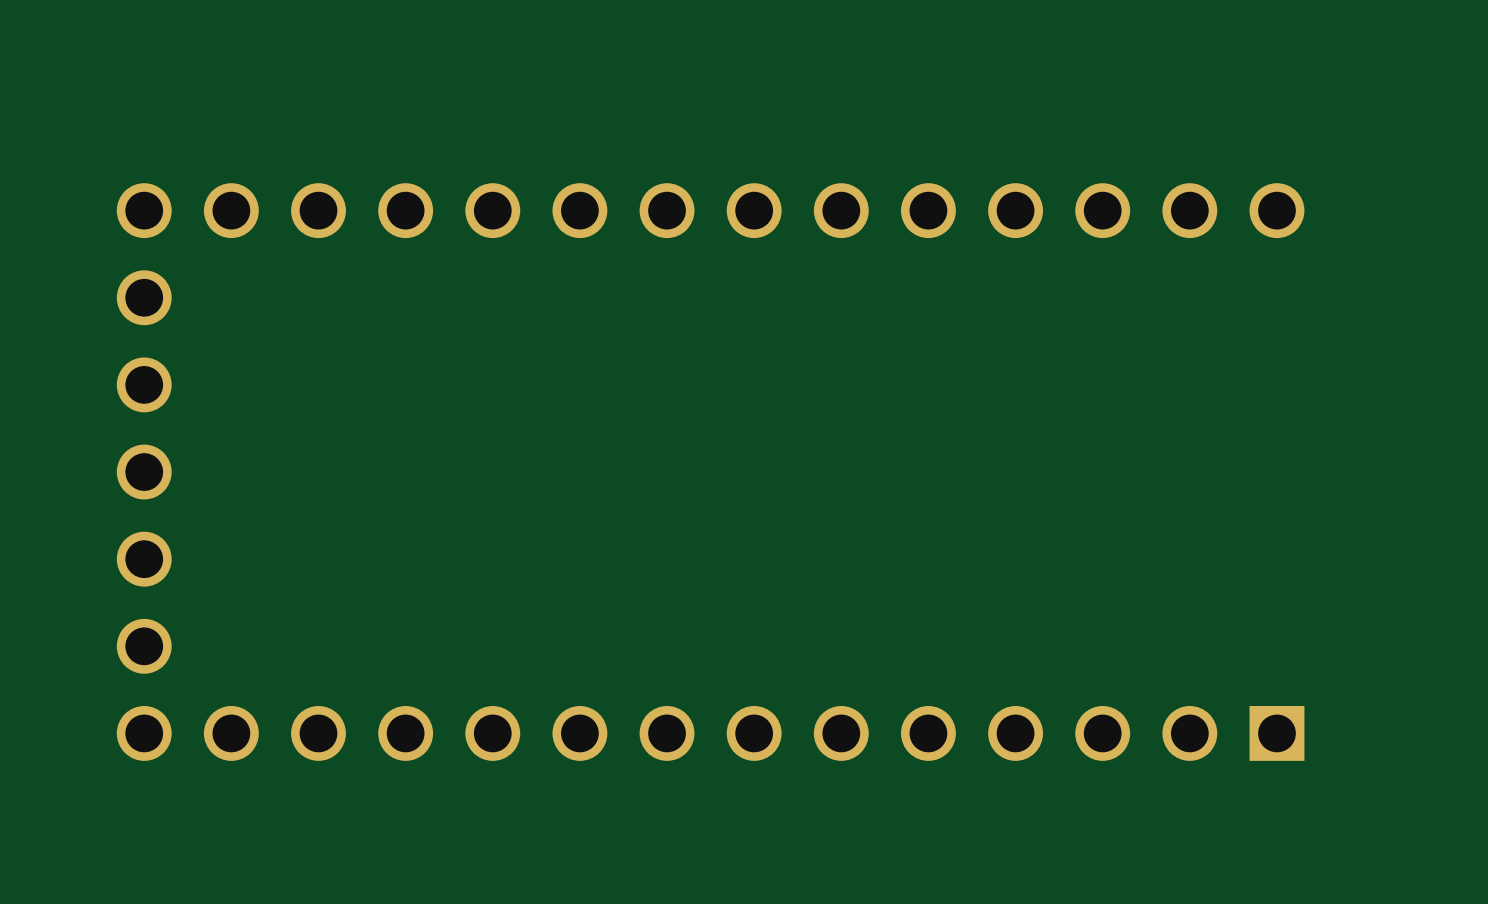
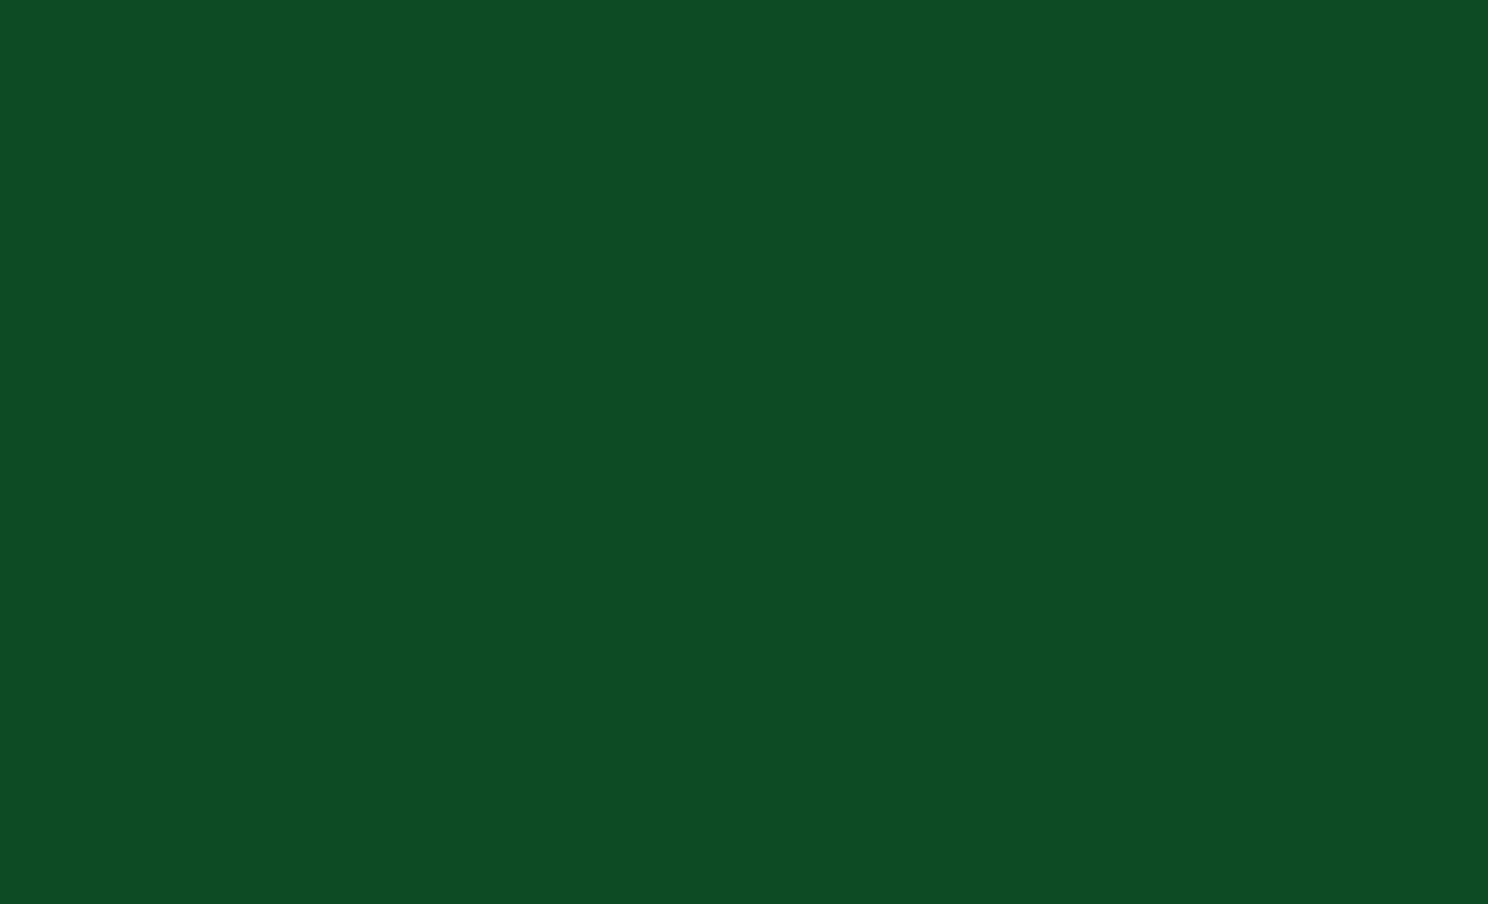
part: (710, 472) -> none

